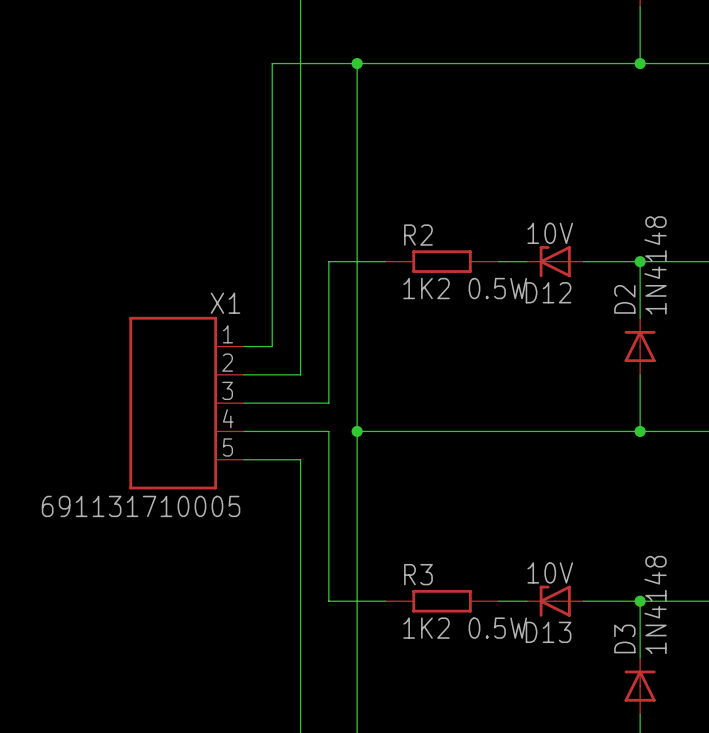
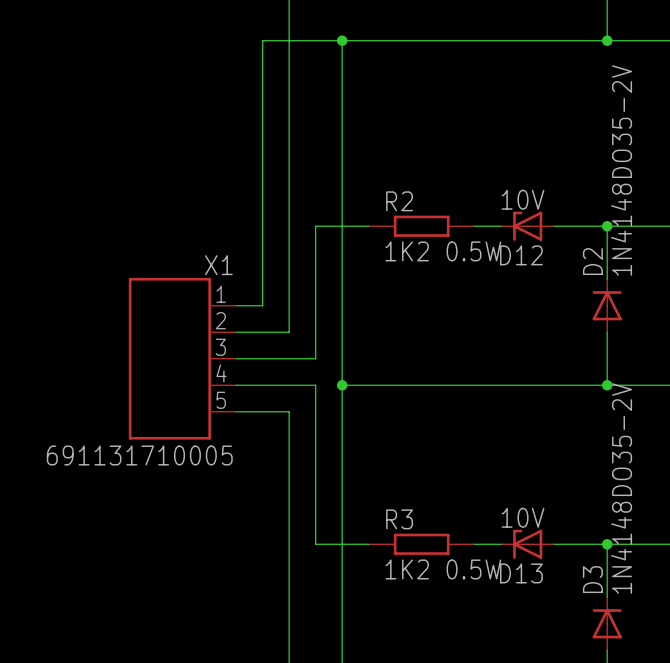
D2 value: 1N4148 (655, 265) -> 1N4148DO35-2V (621, 170)
D3 value: 1N4148 (655, 605) -> 1N4148DO35-2V (621, 488)

